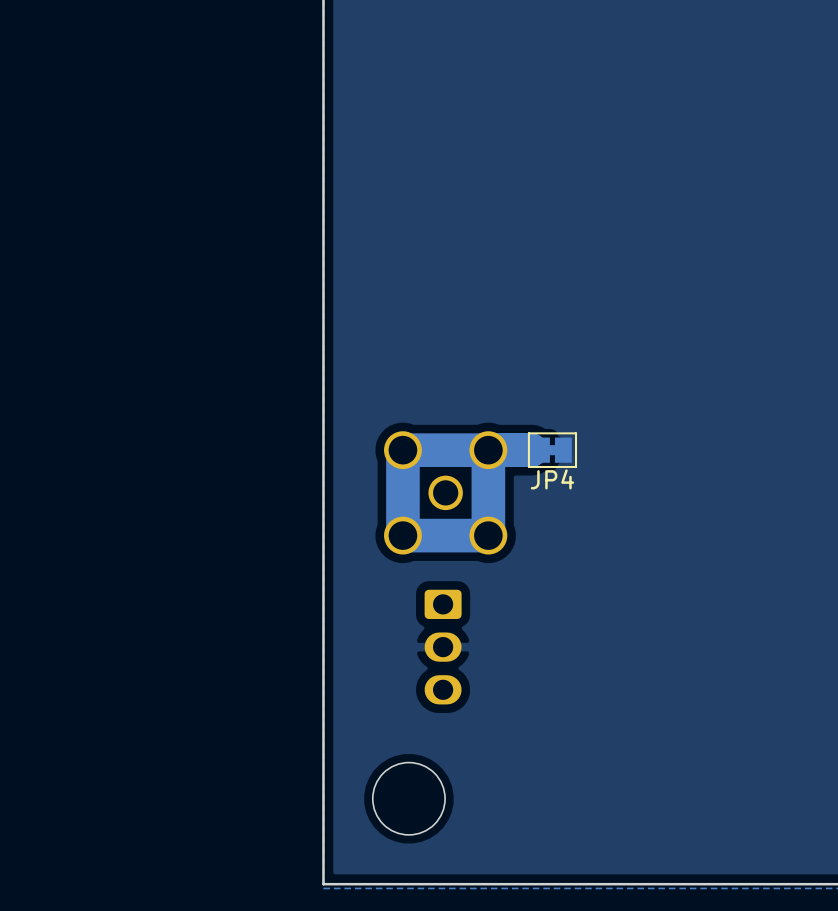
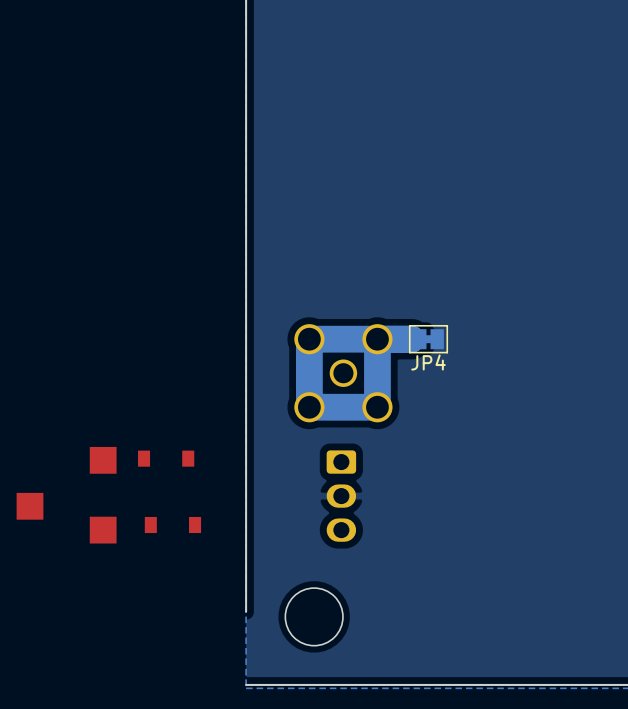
part: none -> (166, 458)
part: none -> (103, 460)
part: none -> (30, 506)
part: none -> (172, 525)
part: none -> (103, 530)
board edge: (323, 792) (323, 884) -> none

